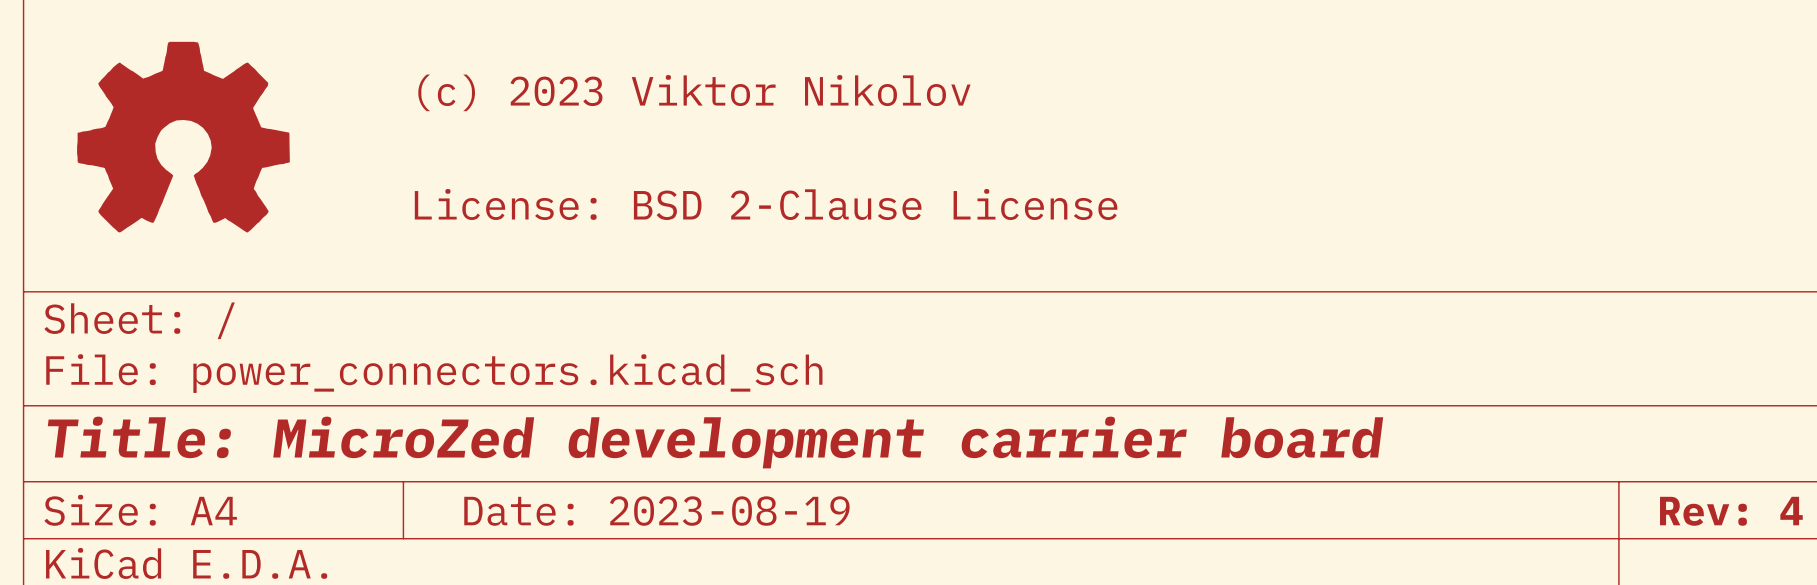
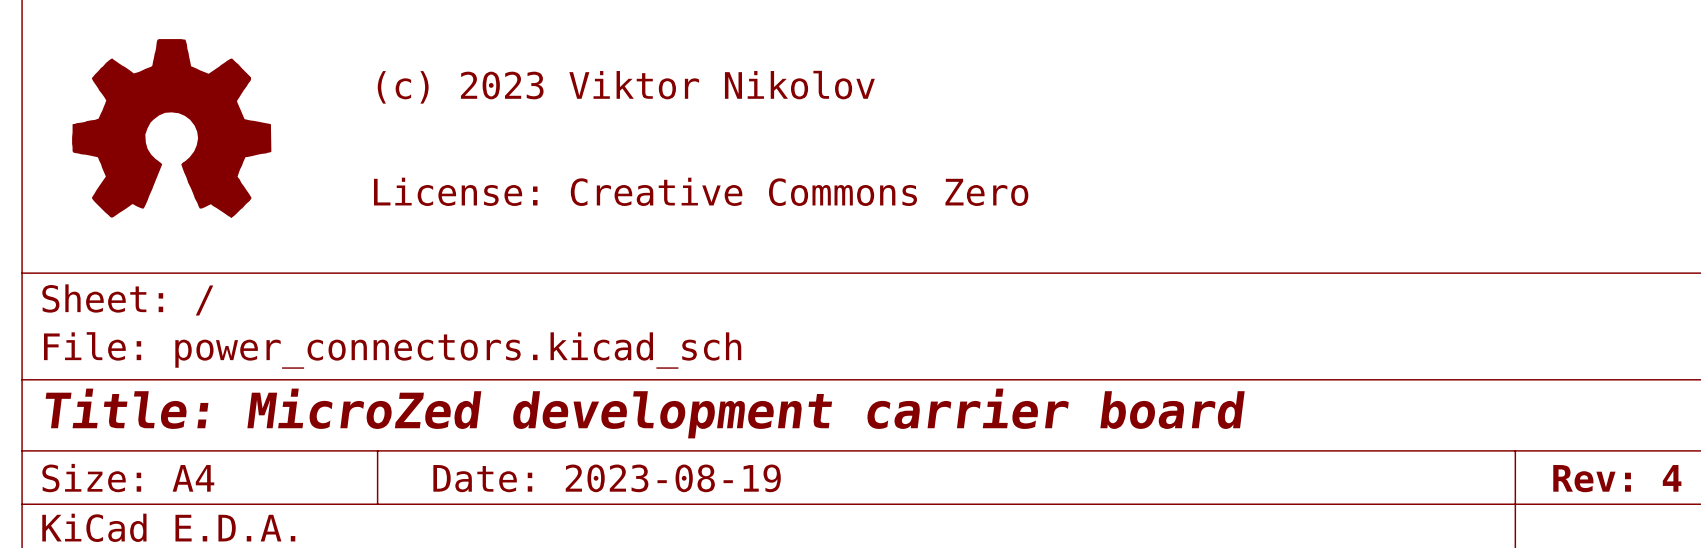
title block: License: BSD 2-Clause License (766, 204) -> License: Creative Commons Zero (701, 191)

